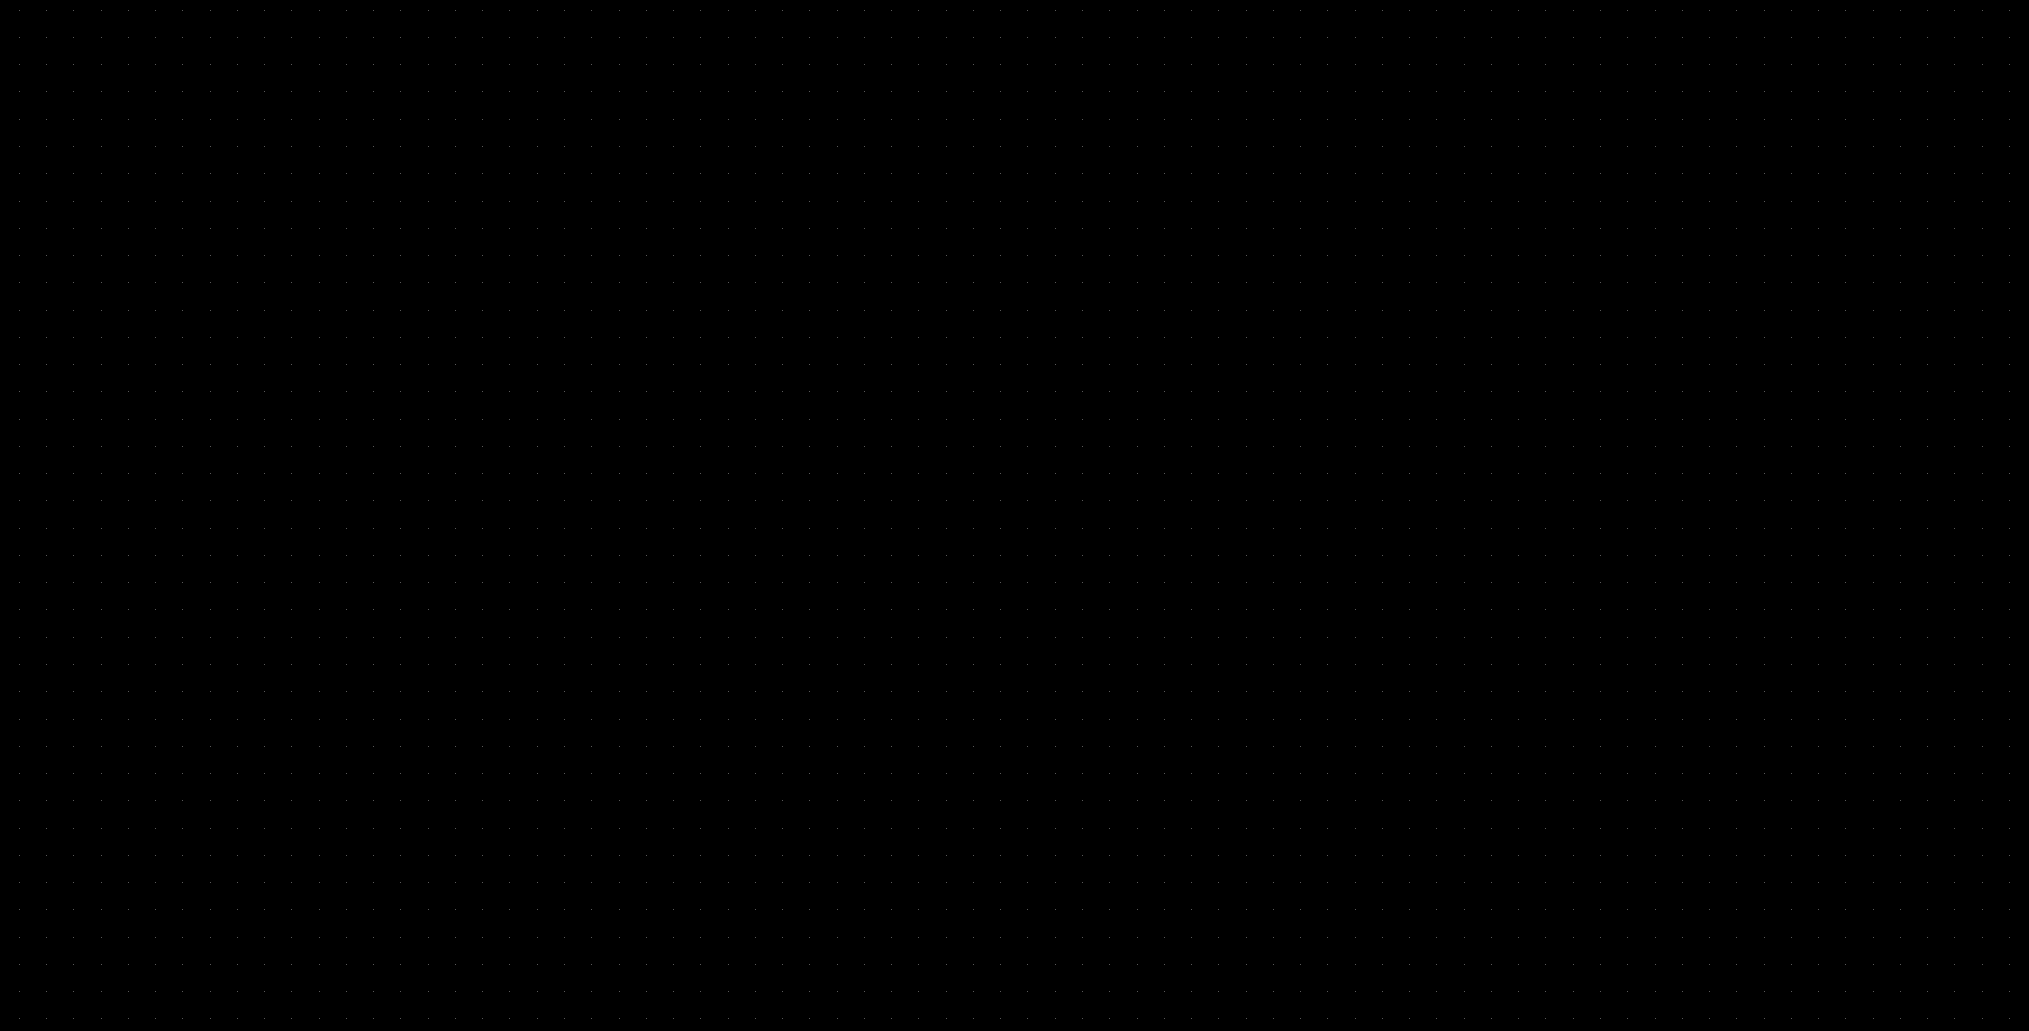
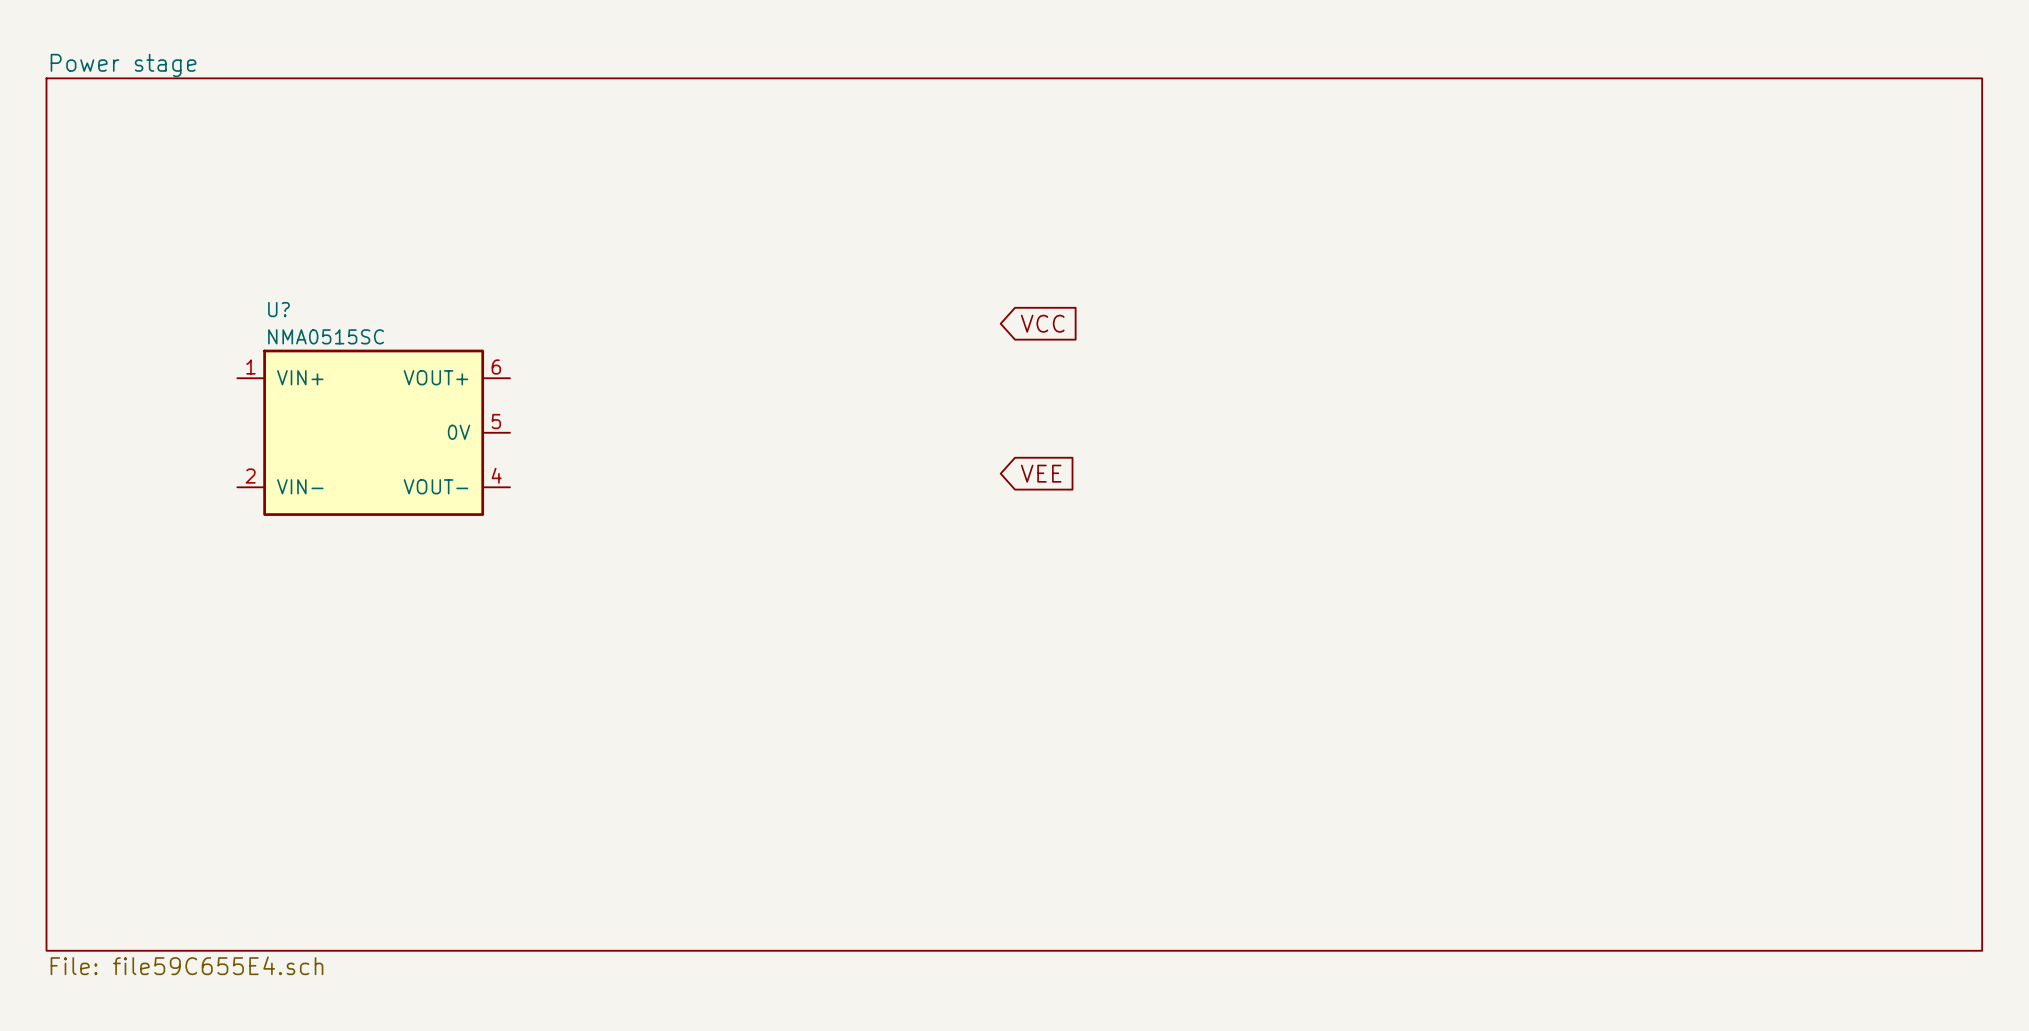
global label: none -> VCC (1042, 323)
U?: none -> NMA0515SC (373, 432)
global label: none -> VEE (1041, 473)
sheet Power stage: none -> File: file59C655E4.sch (1014, 514)

